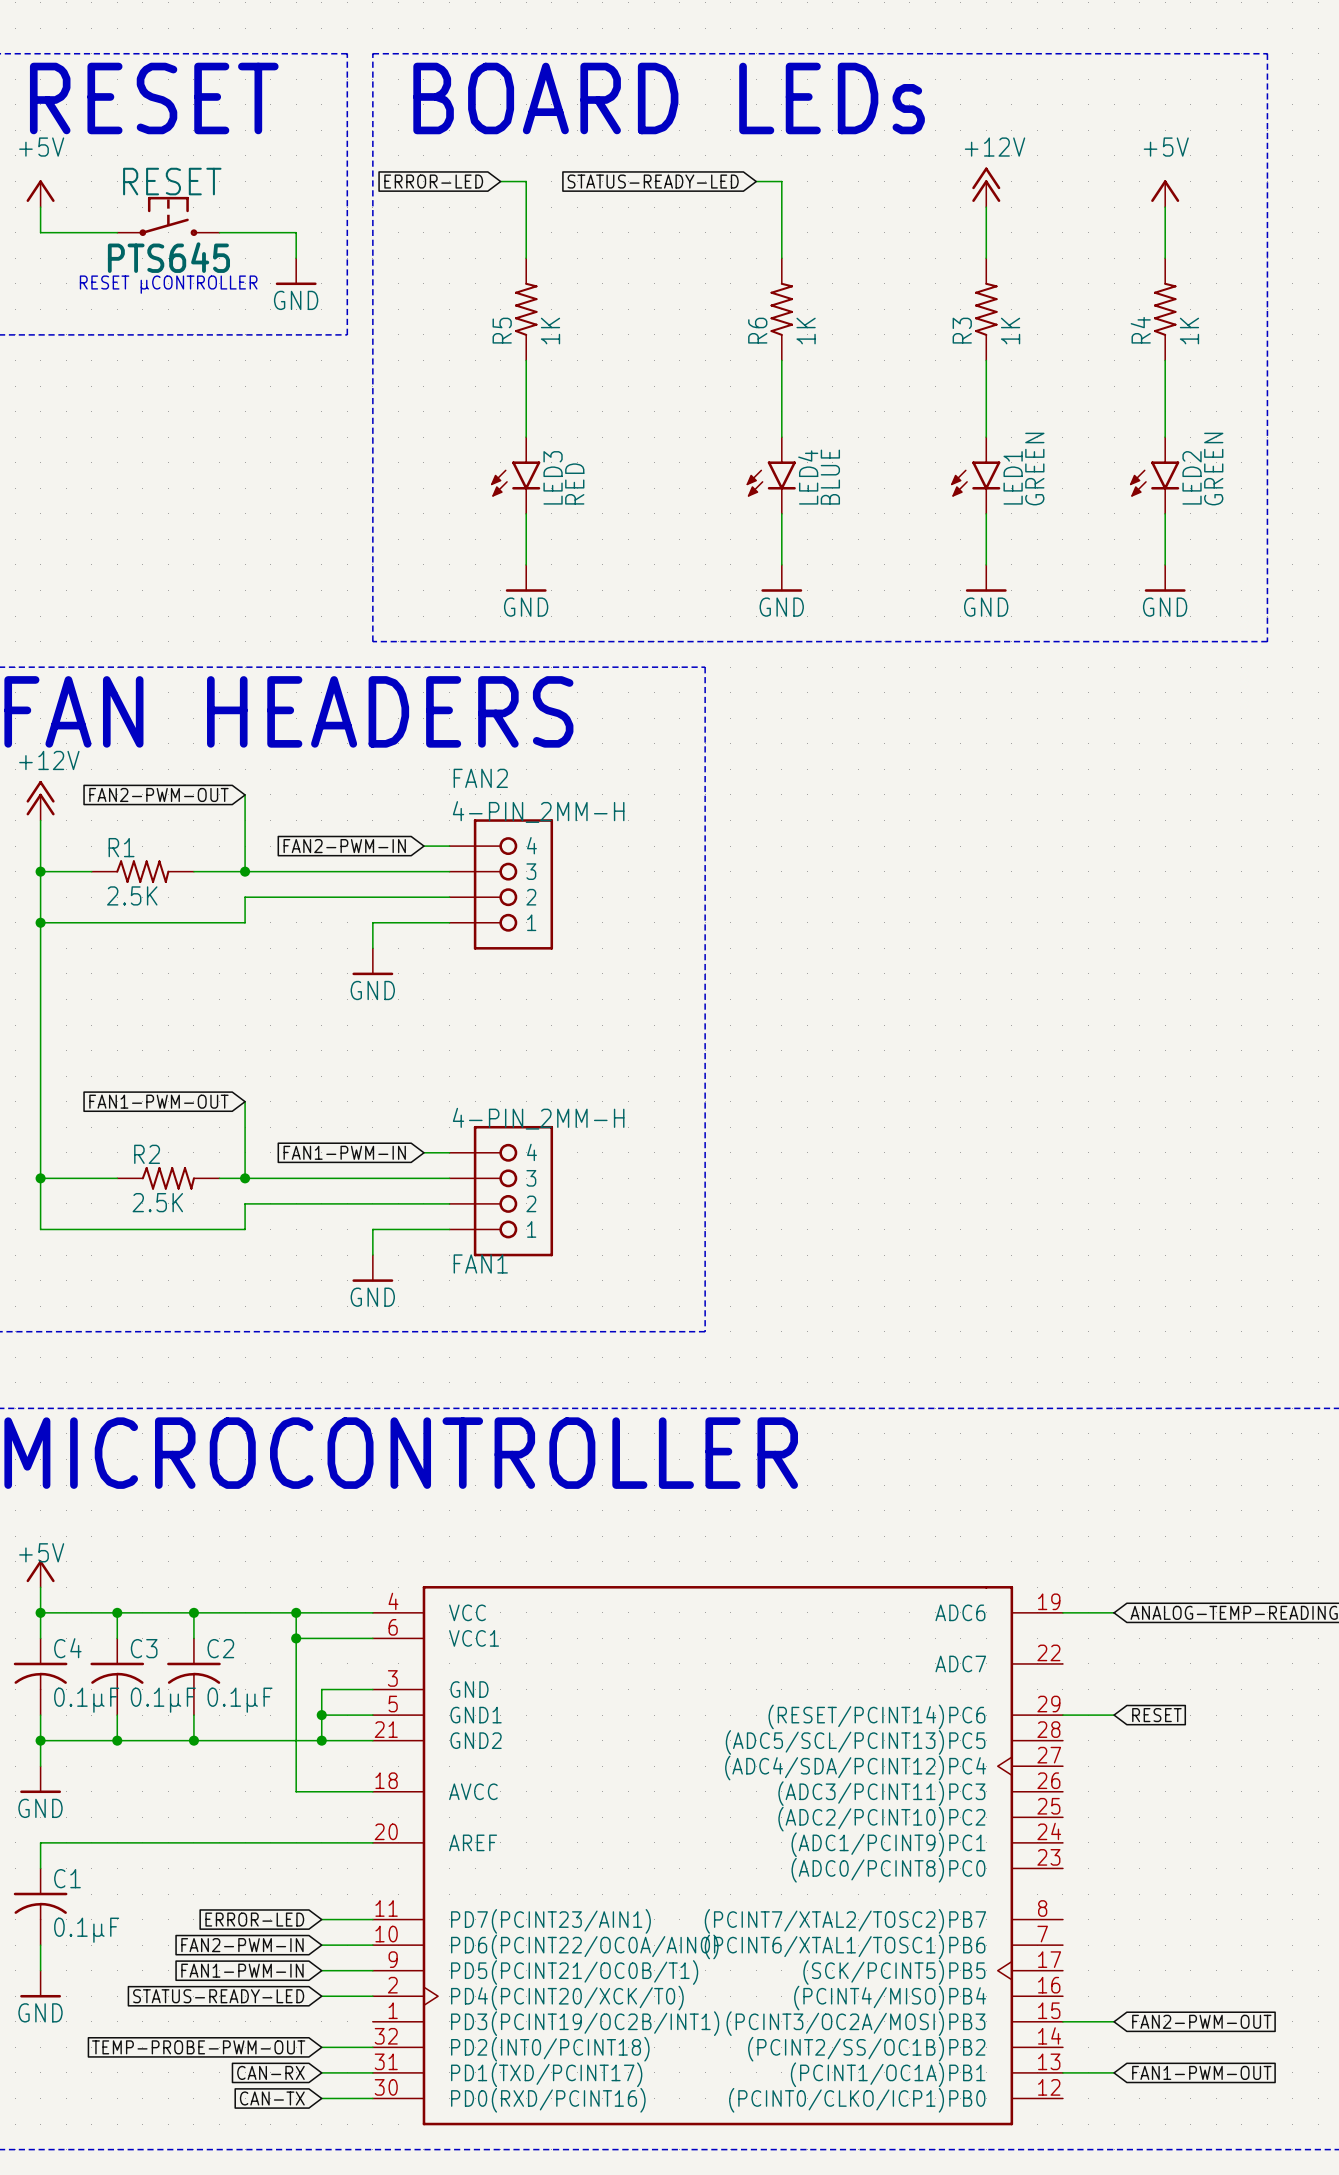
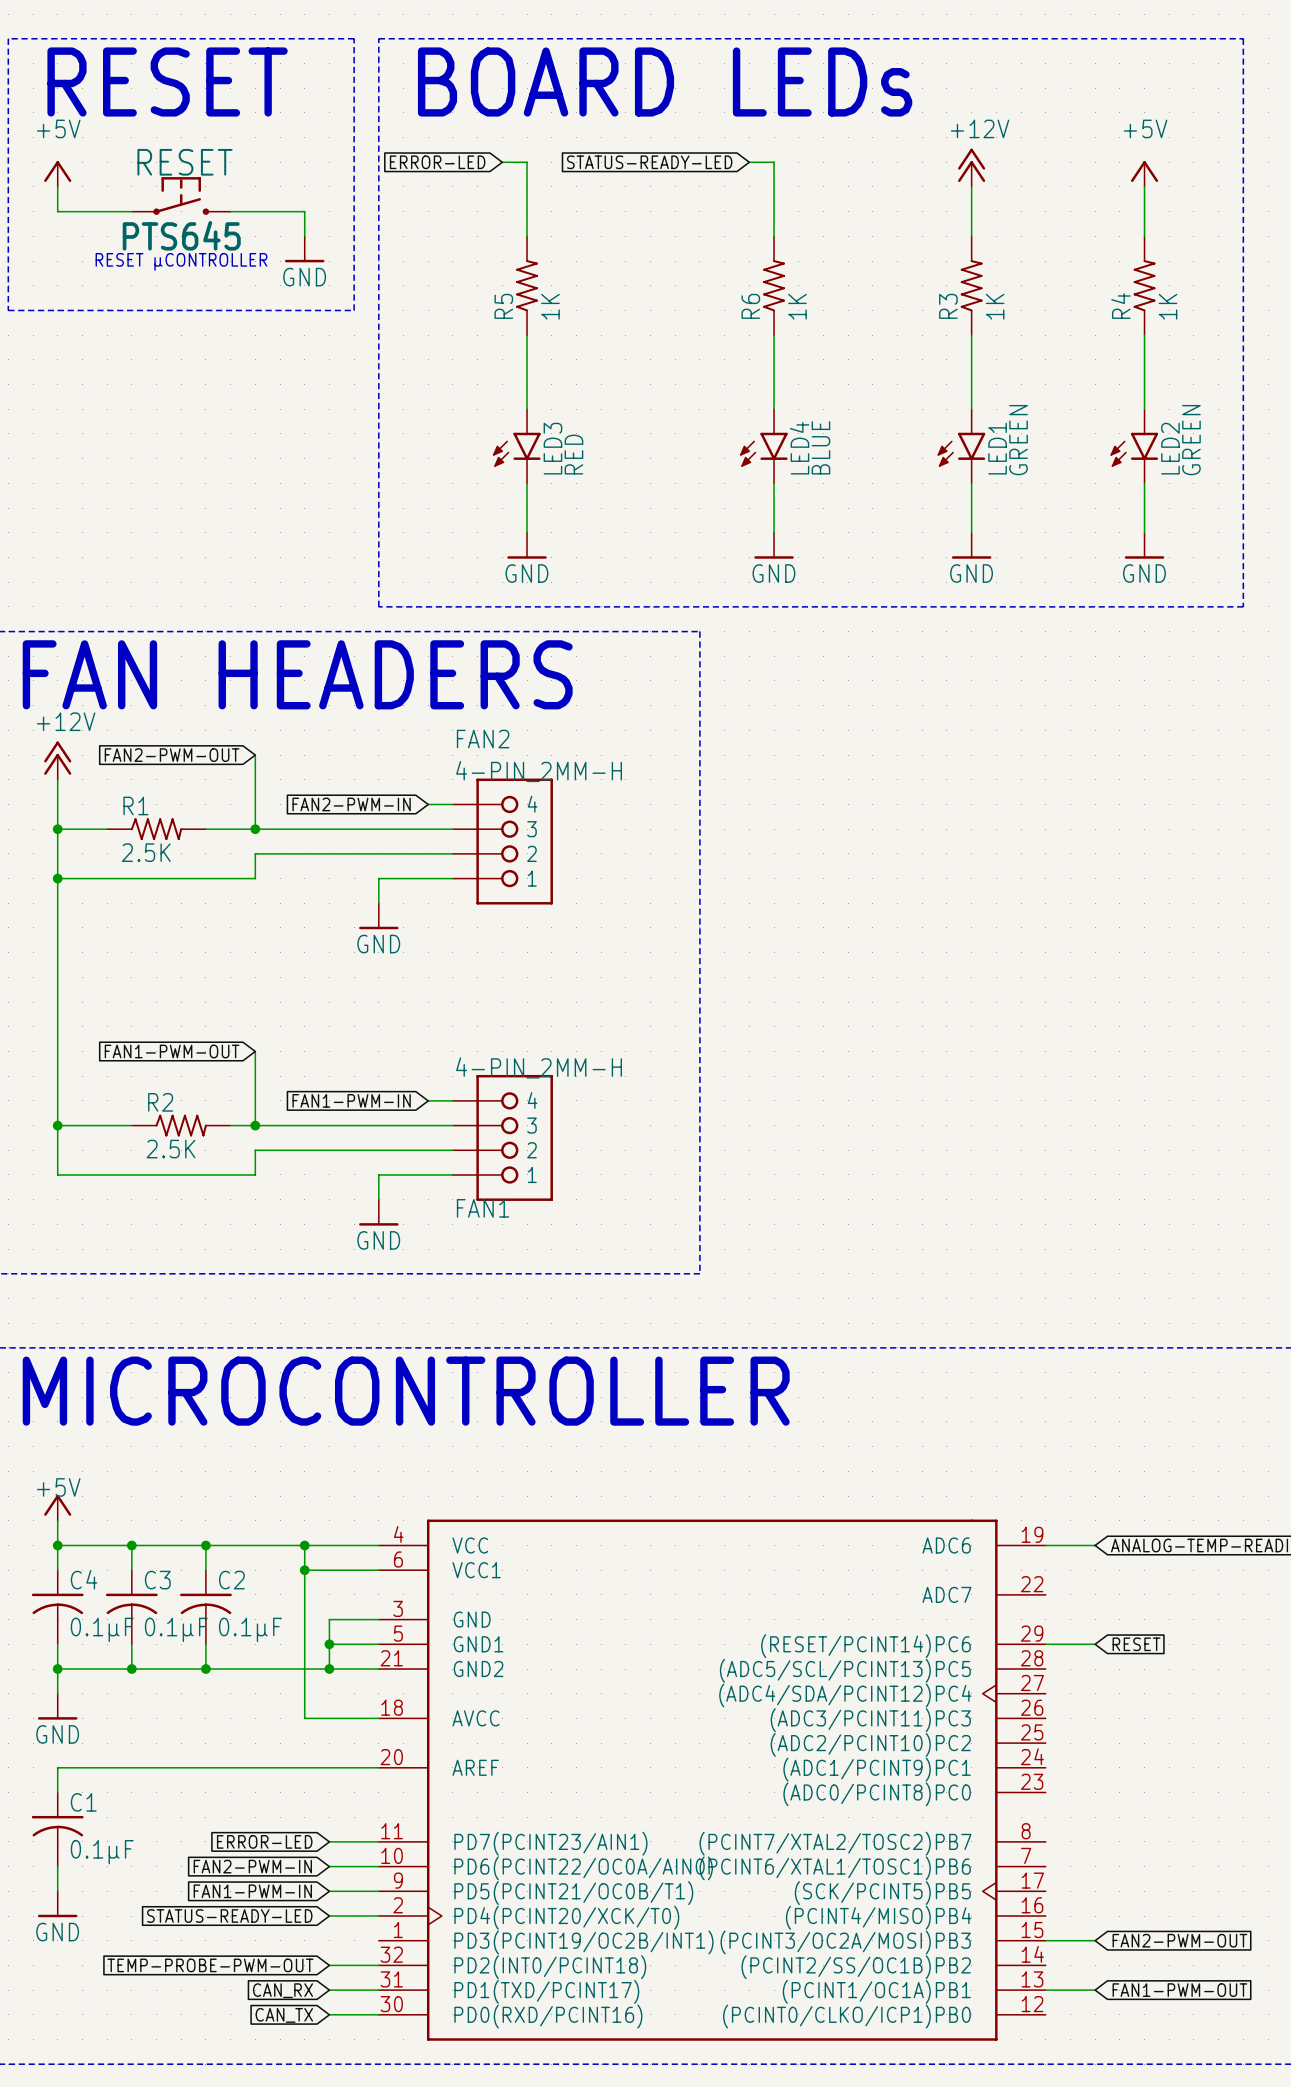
global label: CAN-RX (270, 2072) -> CAN_RX (282, 1990)
global label: CAN-TX (272, 2098) -> CAN_TX (284, 2015)

